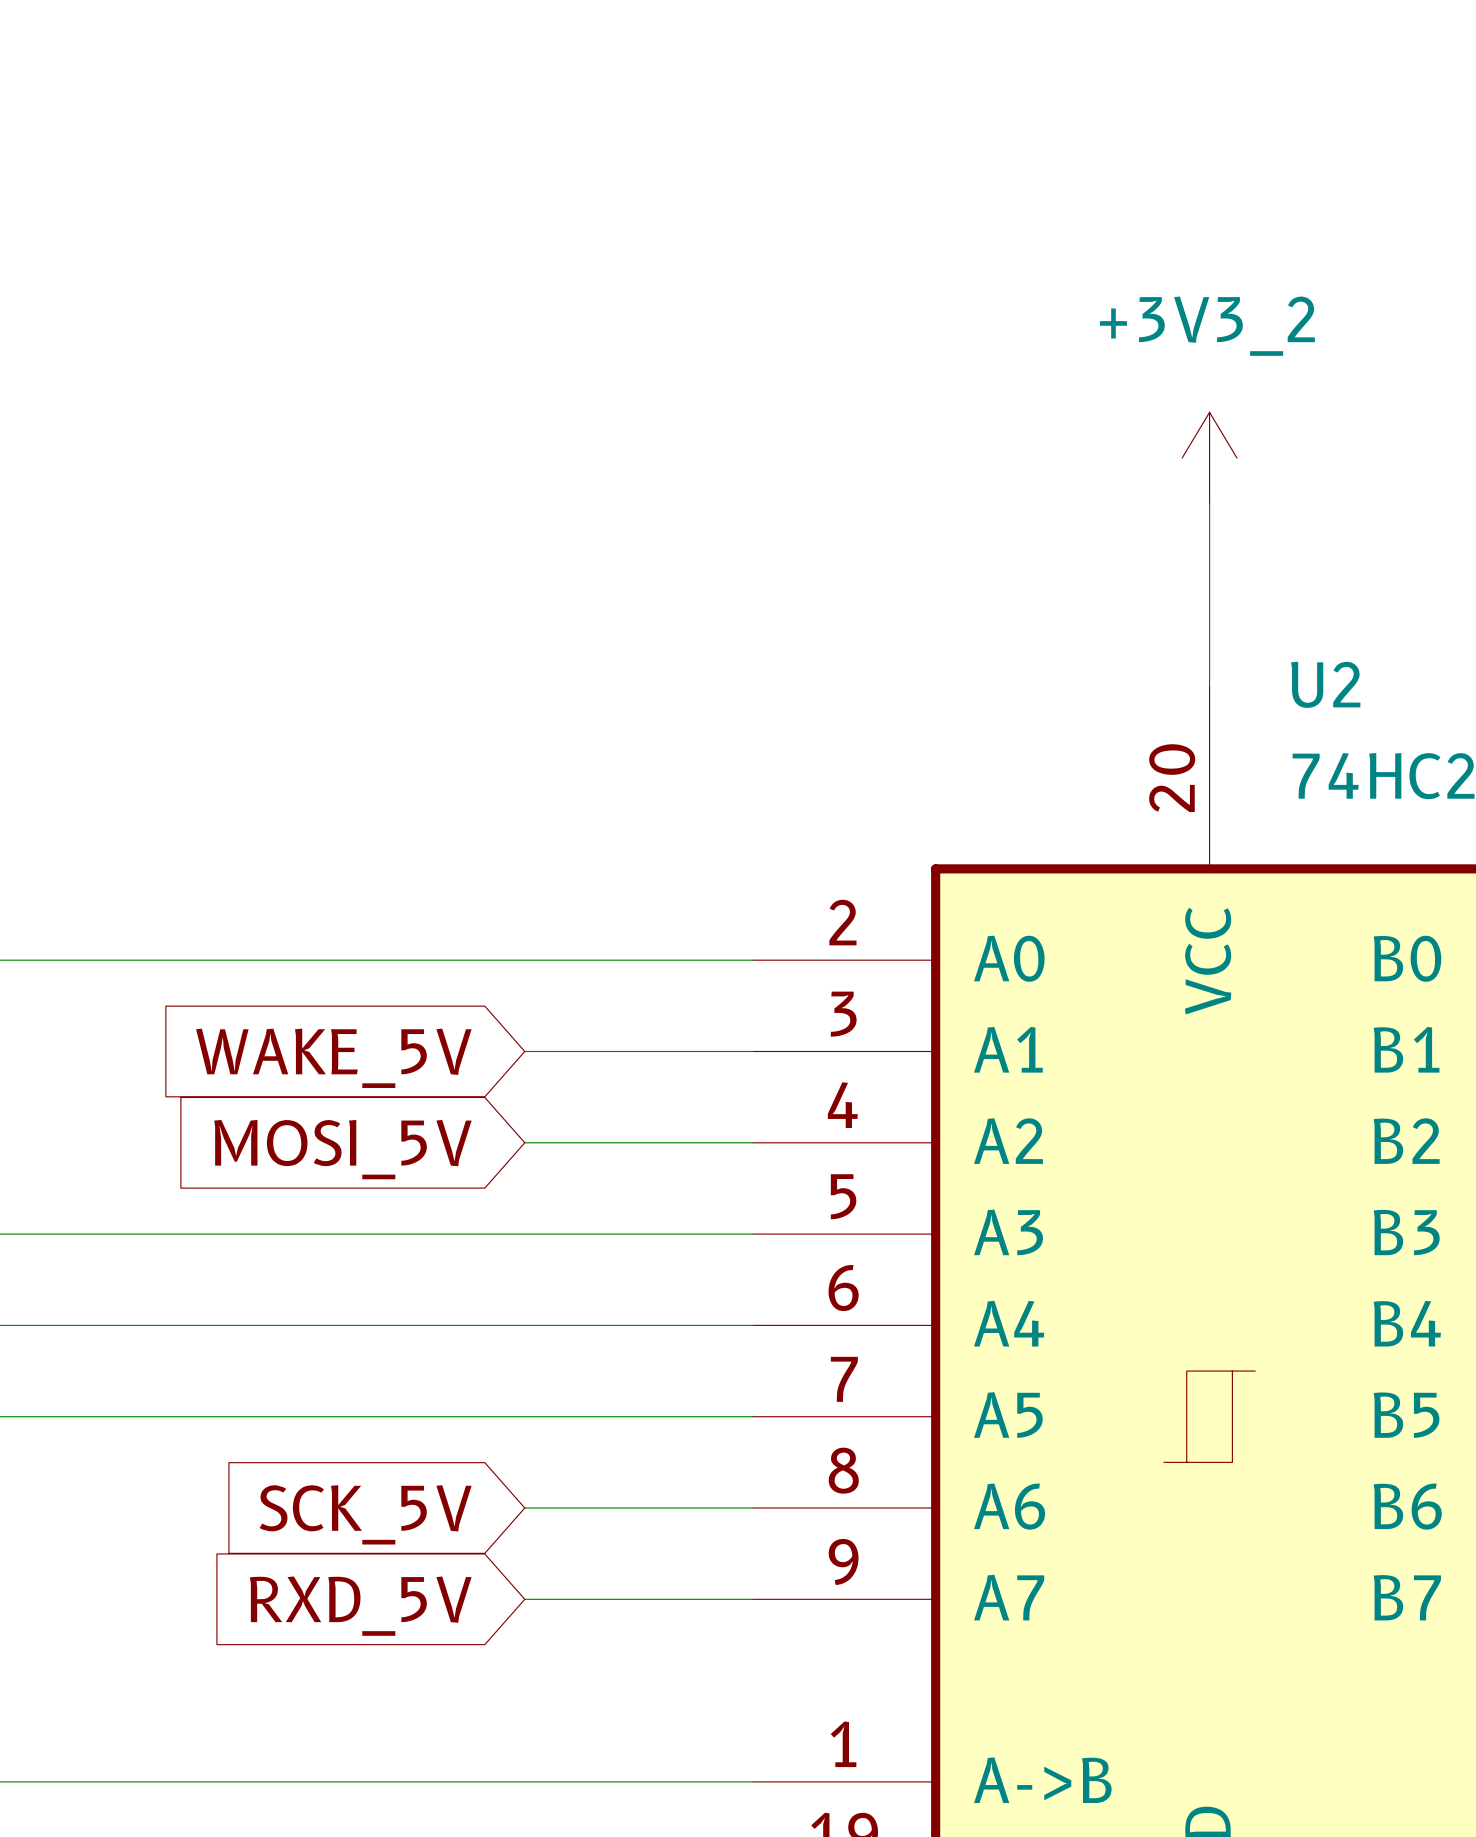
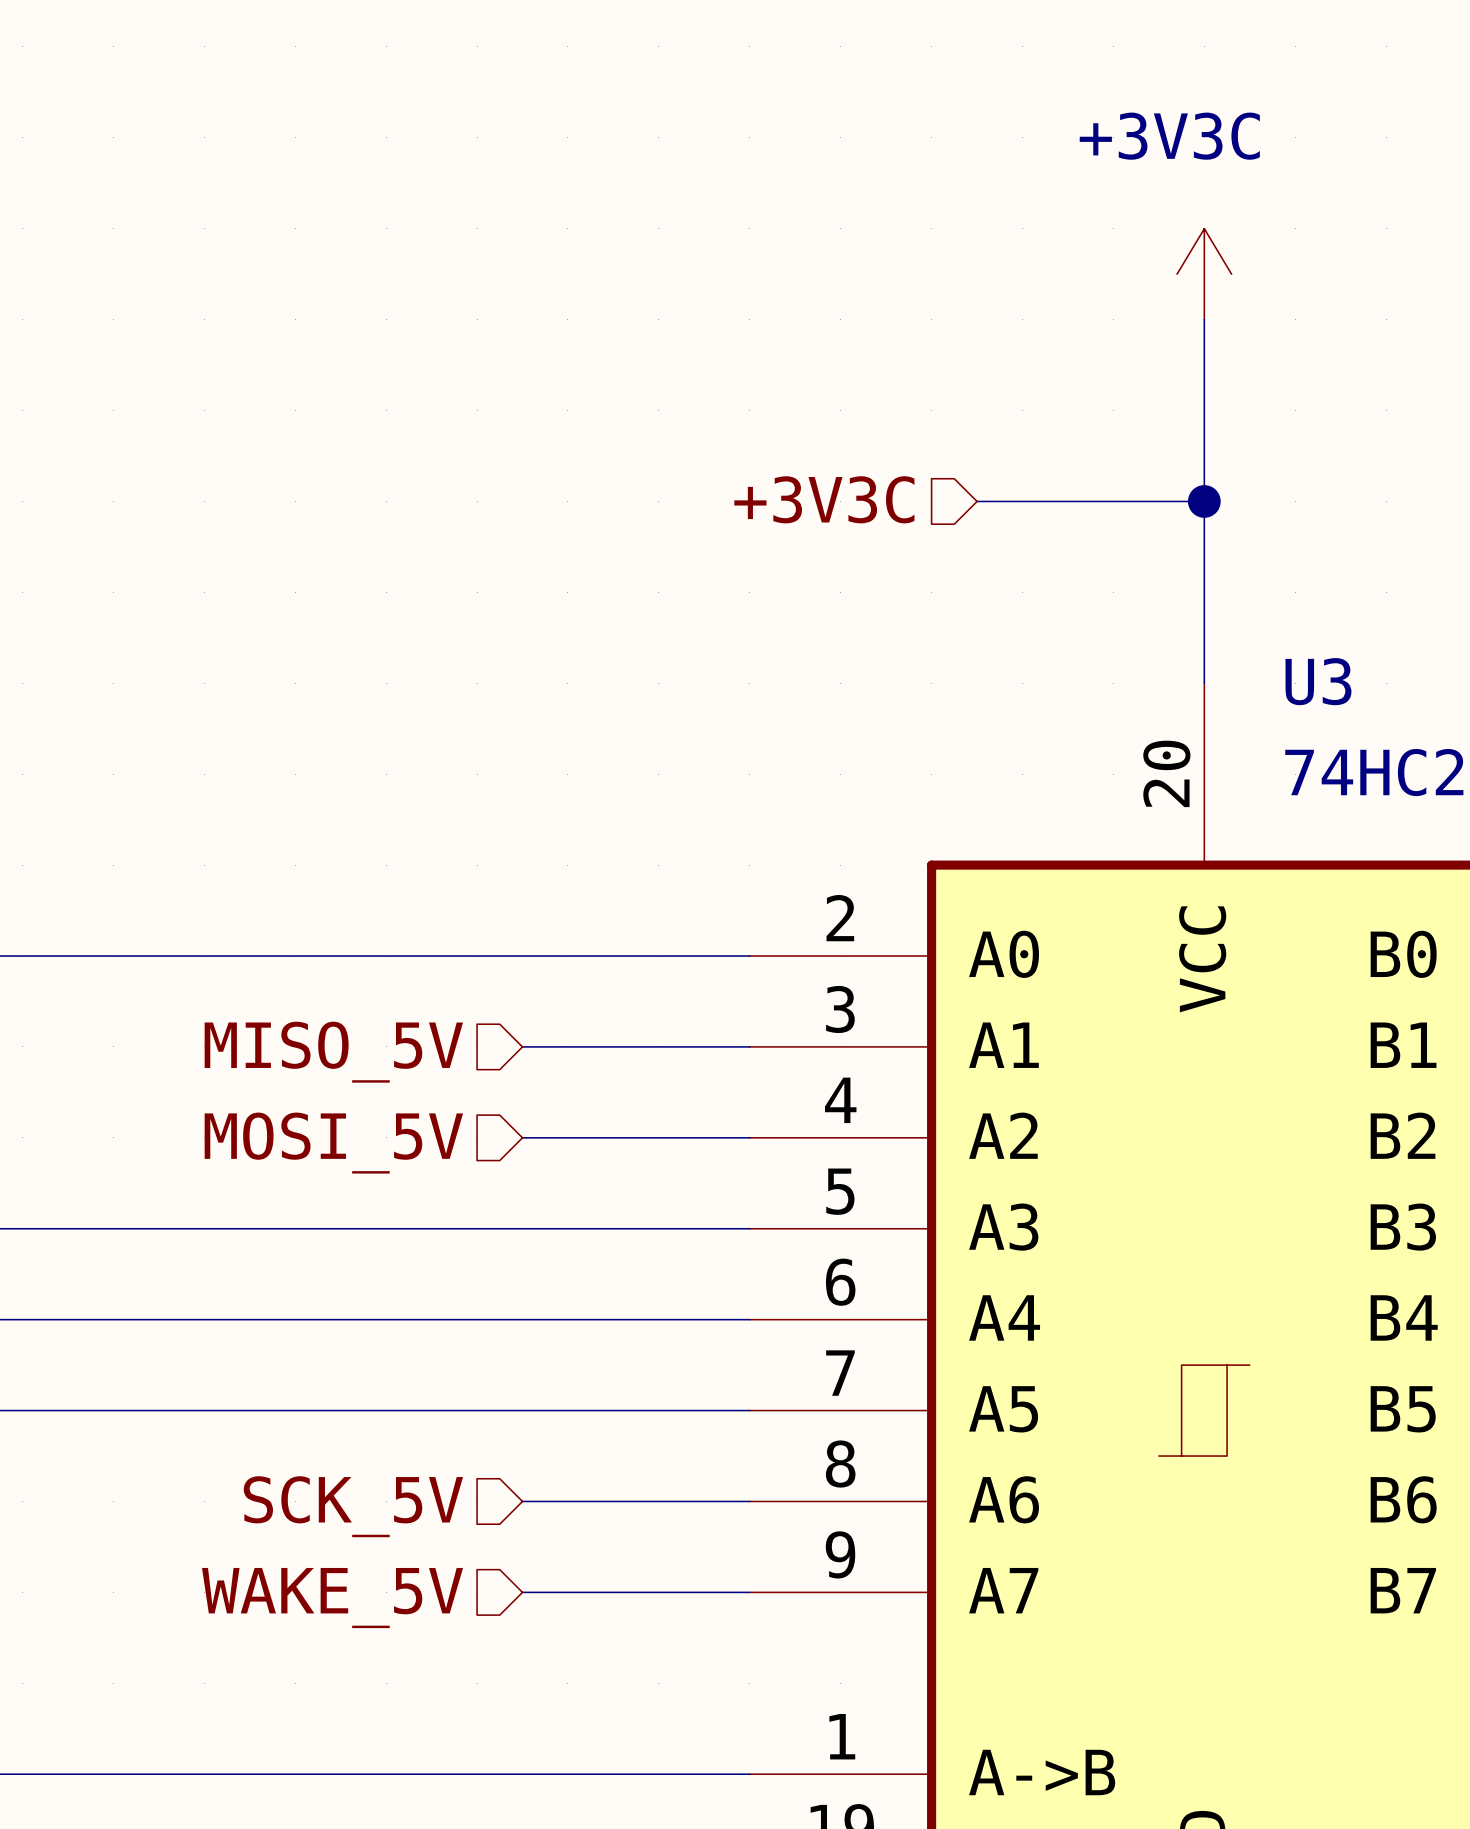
power symbol: none -> +3V3C (1204, 274)
wire: none -> (1204, 319) (1204, 501) (977, 501)
power symbol: +3V3_2 (1209, 458) -> none
hierarchical label: none -> +3V3C (824, 499)
junction: none -> (1204, 501)
U2 name: U2 (1325, 684) -> U3 (1318, 681)
hierarchical label: none -> MISO_5V (333, 1052)
global label: WAKE_5V (333, 1058) -> none
hierarchical label: none -> MOSI_5V (333, 1143)
global label: MOSI_5V (342, 1149) -> none
hierarchical label: none -> SCK_5V (353, 1506)
global label: SCK_5V (365, 1514) -> none
hierarchical label: none -> WAKE_5V (332, 1598)
global label: RXD_5V (360, 1606) -> none

